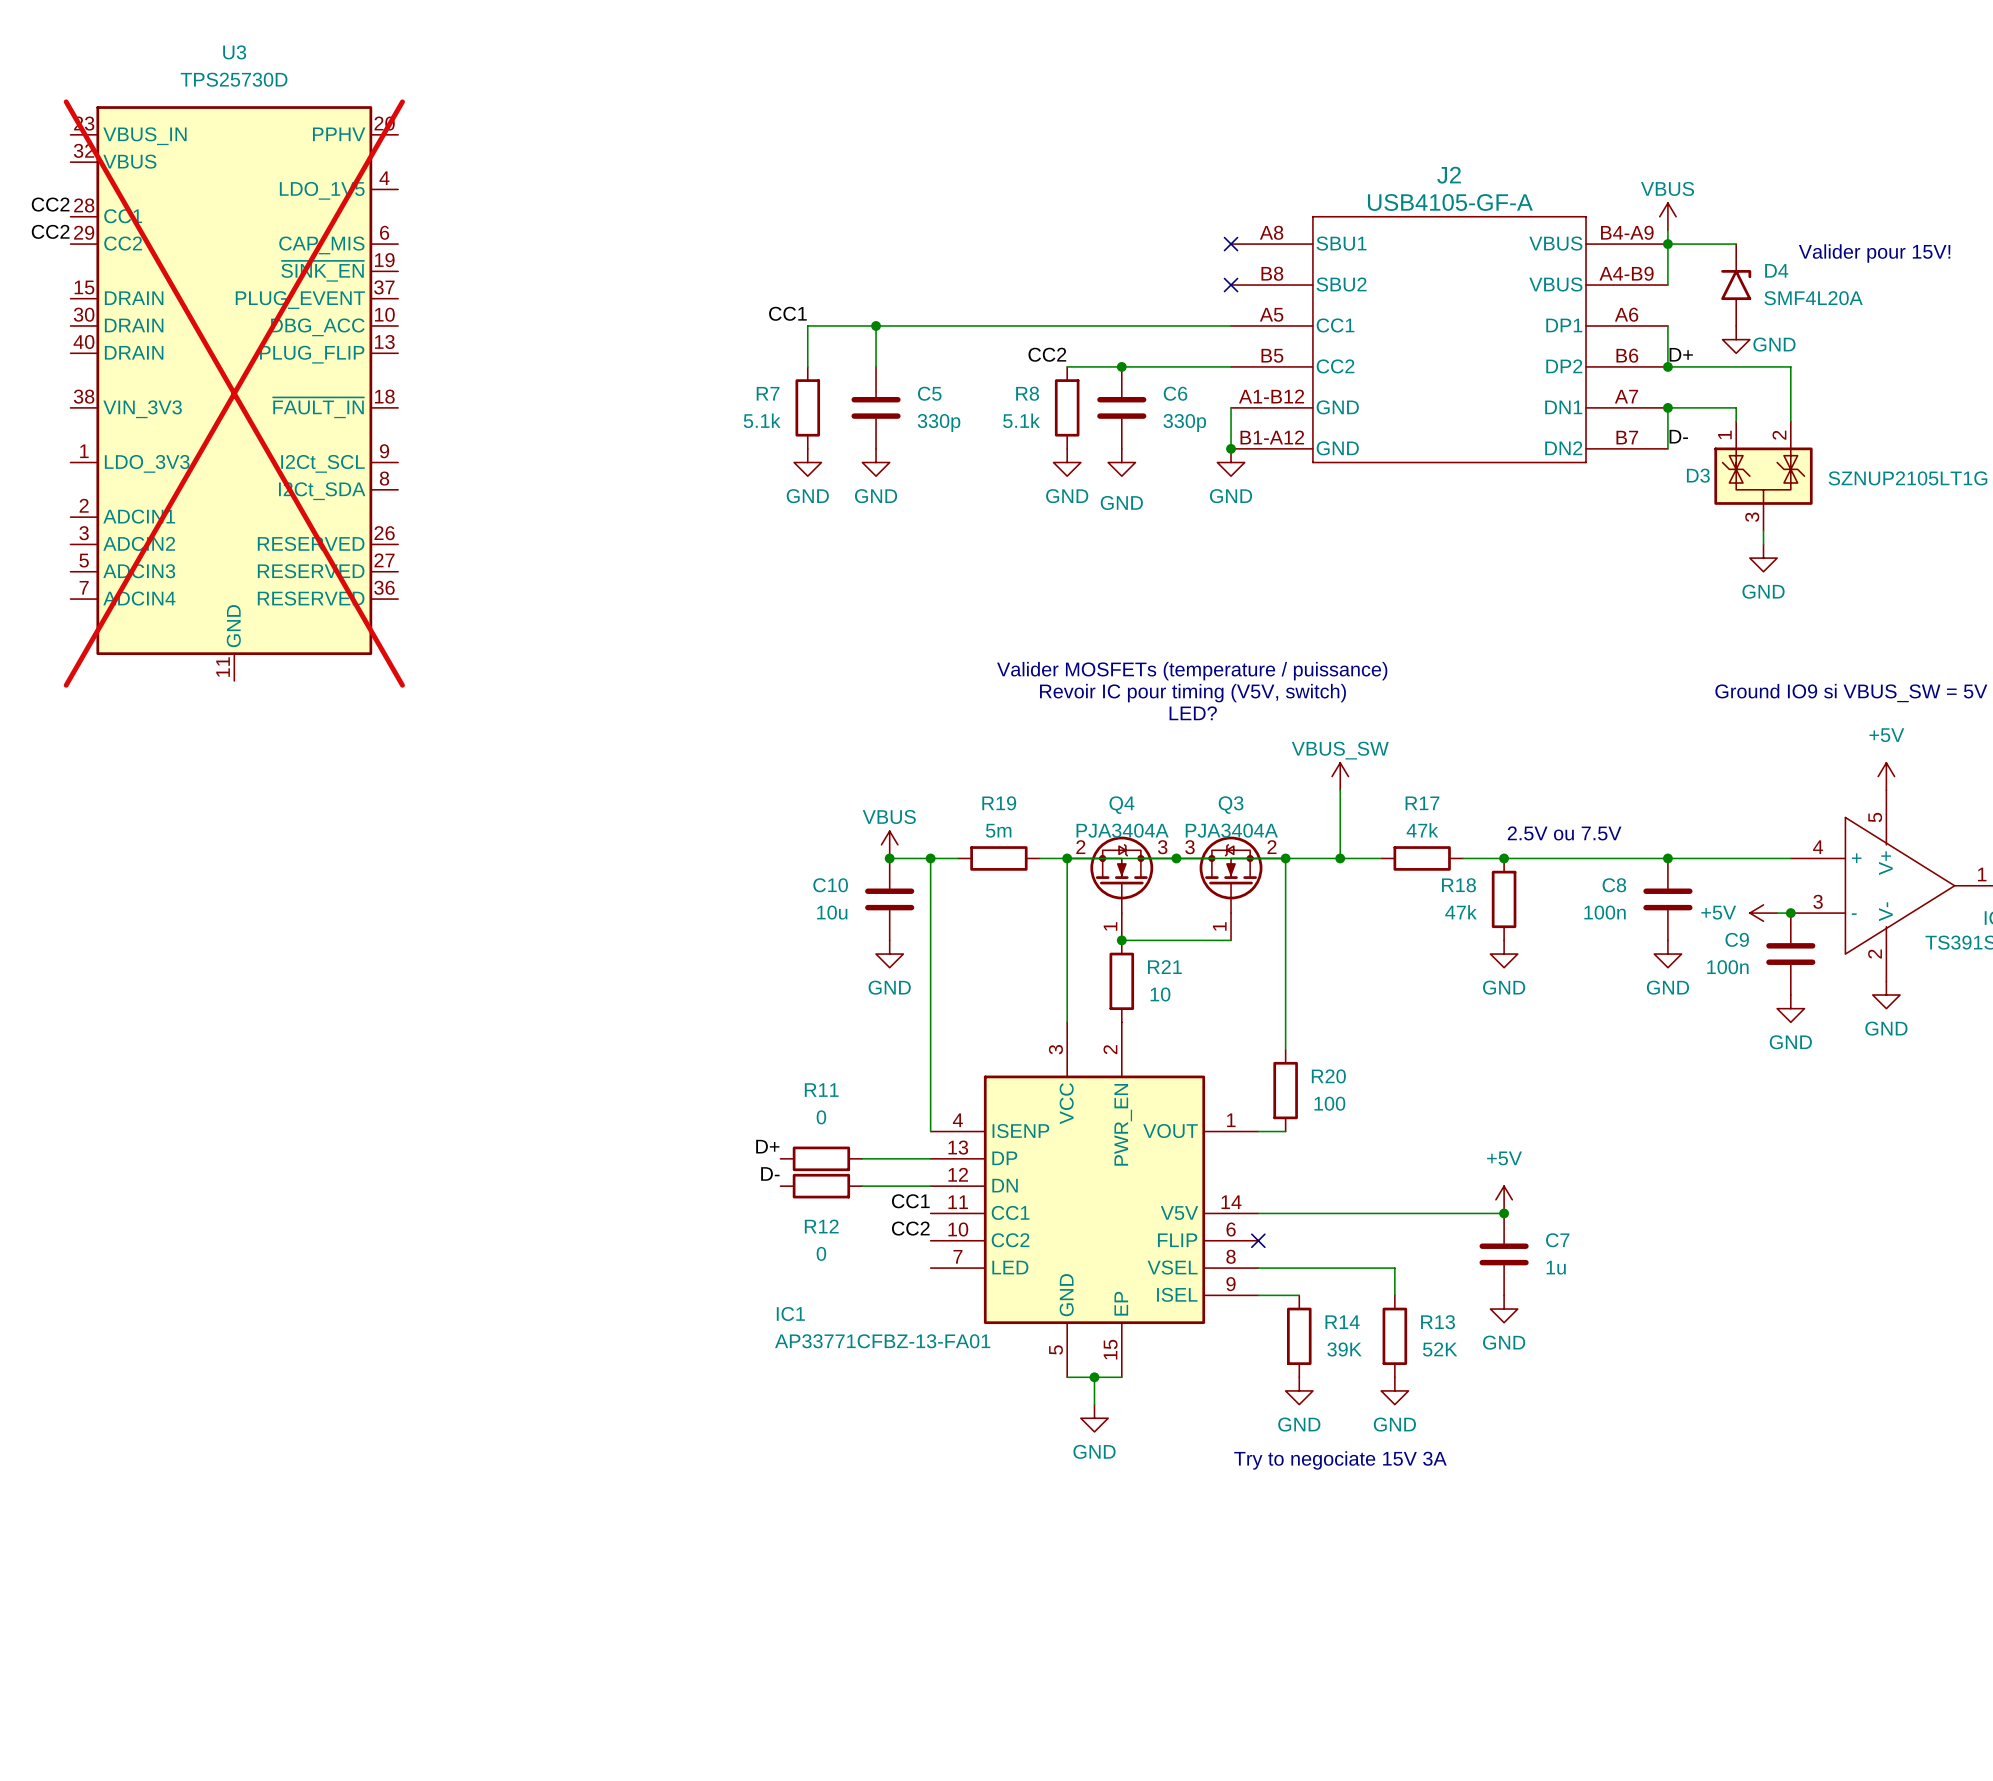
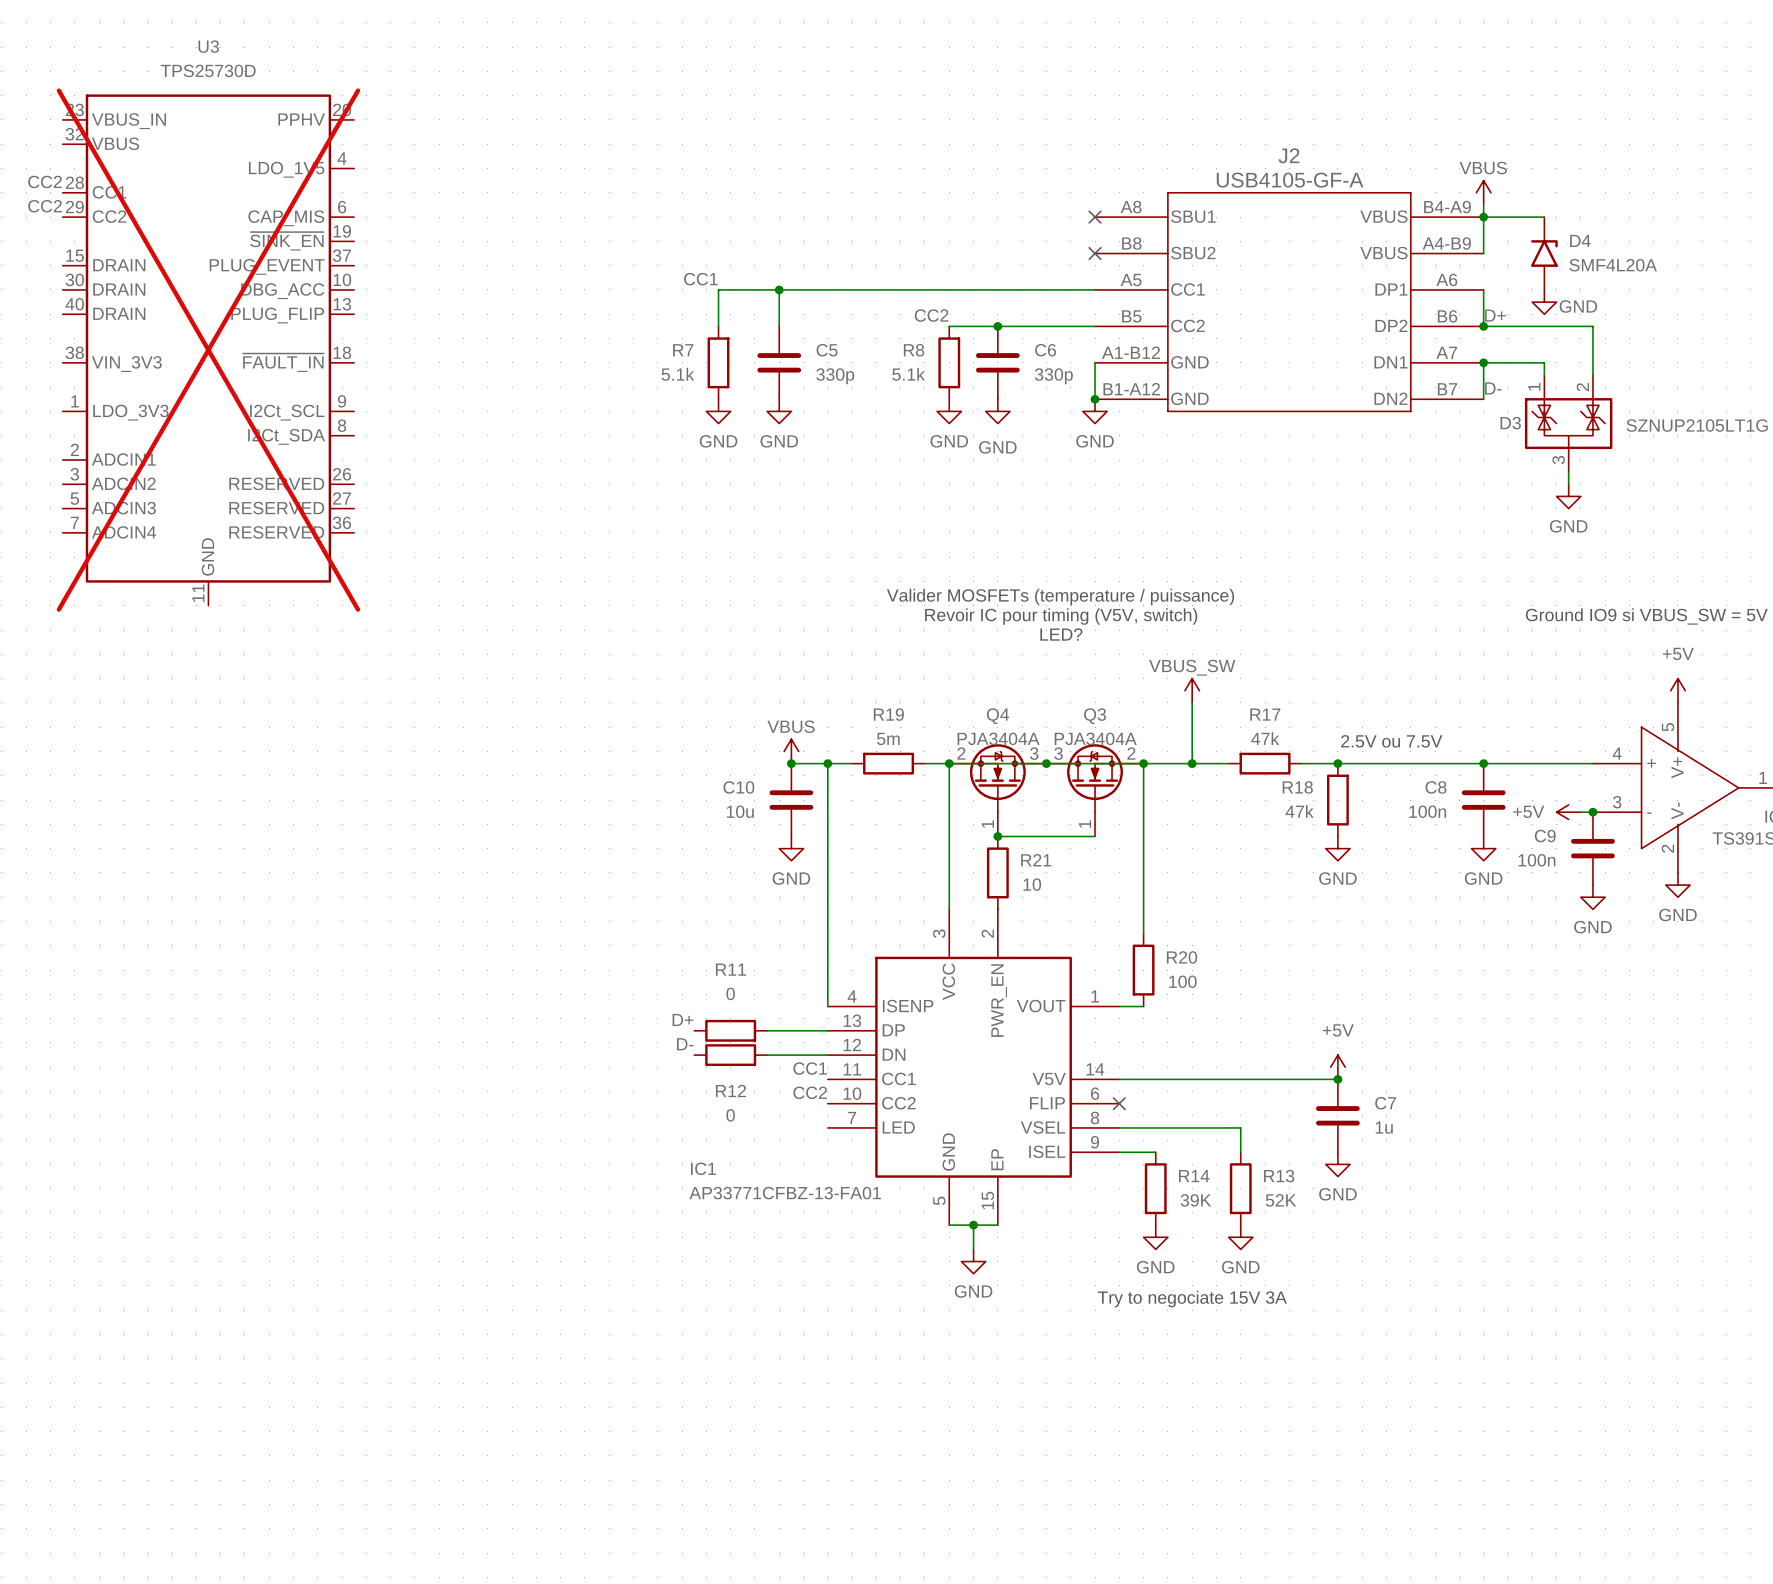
text: Valider pour 15V! (1874, 253) -> none

